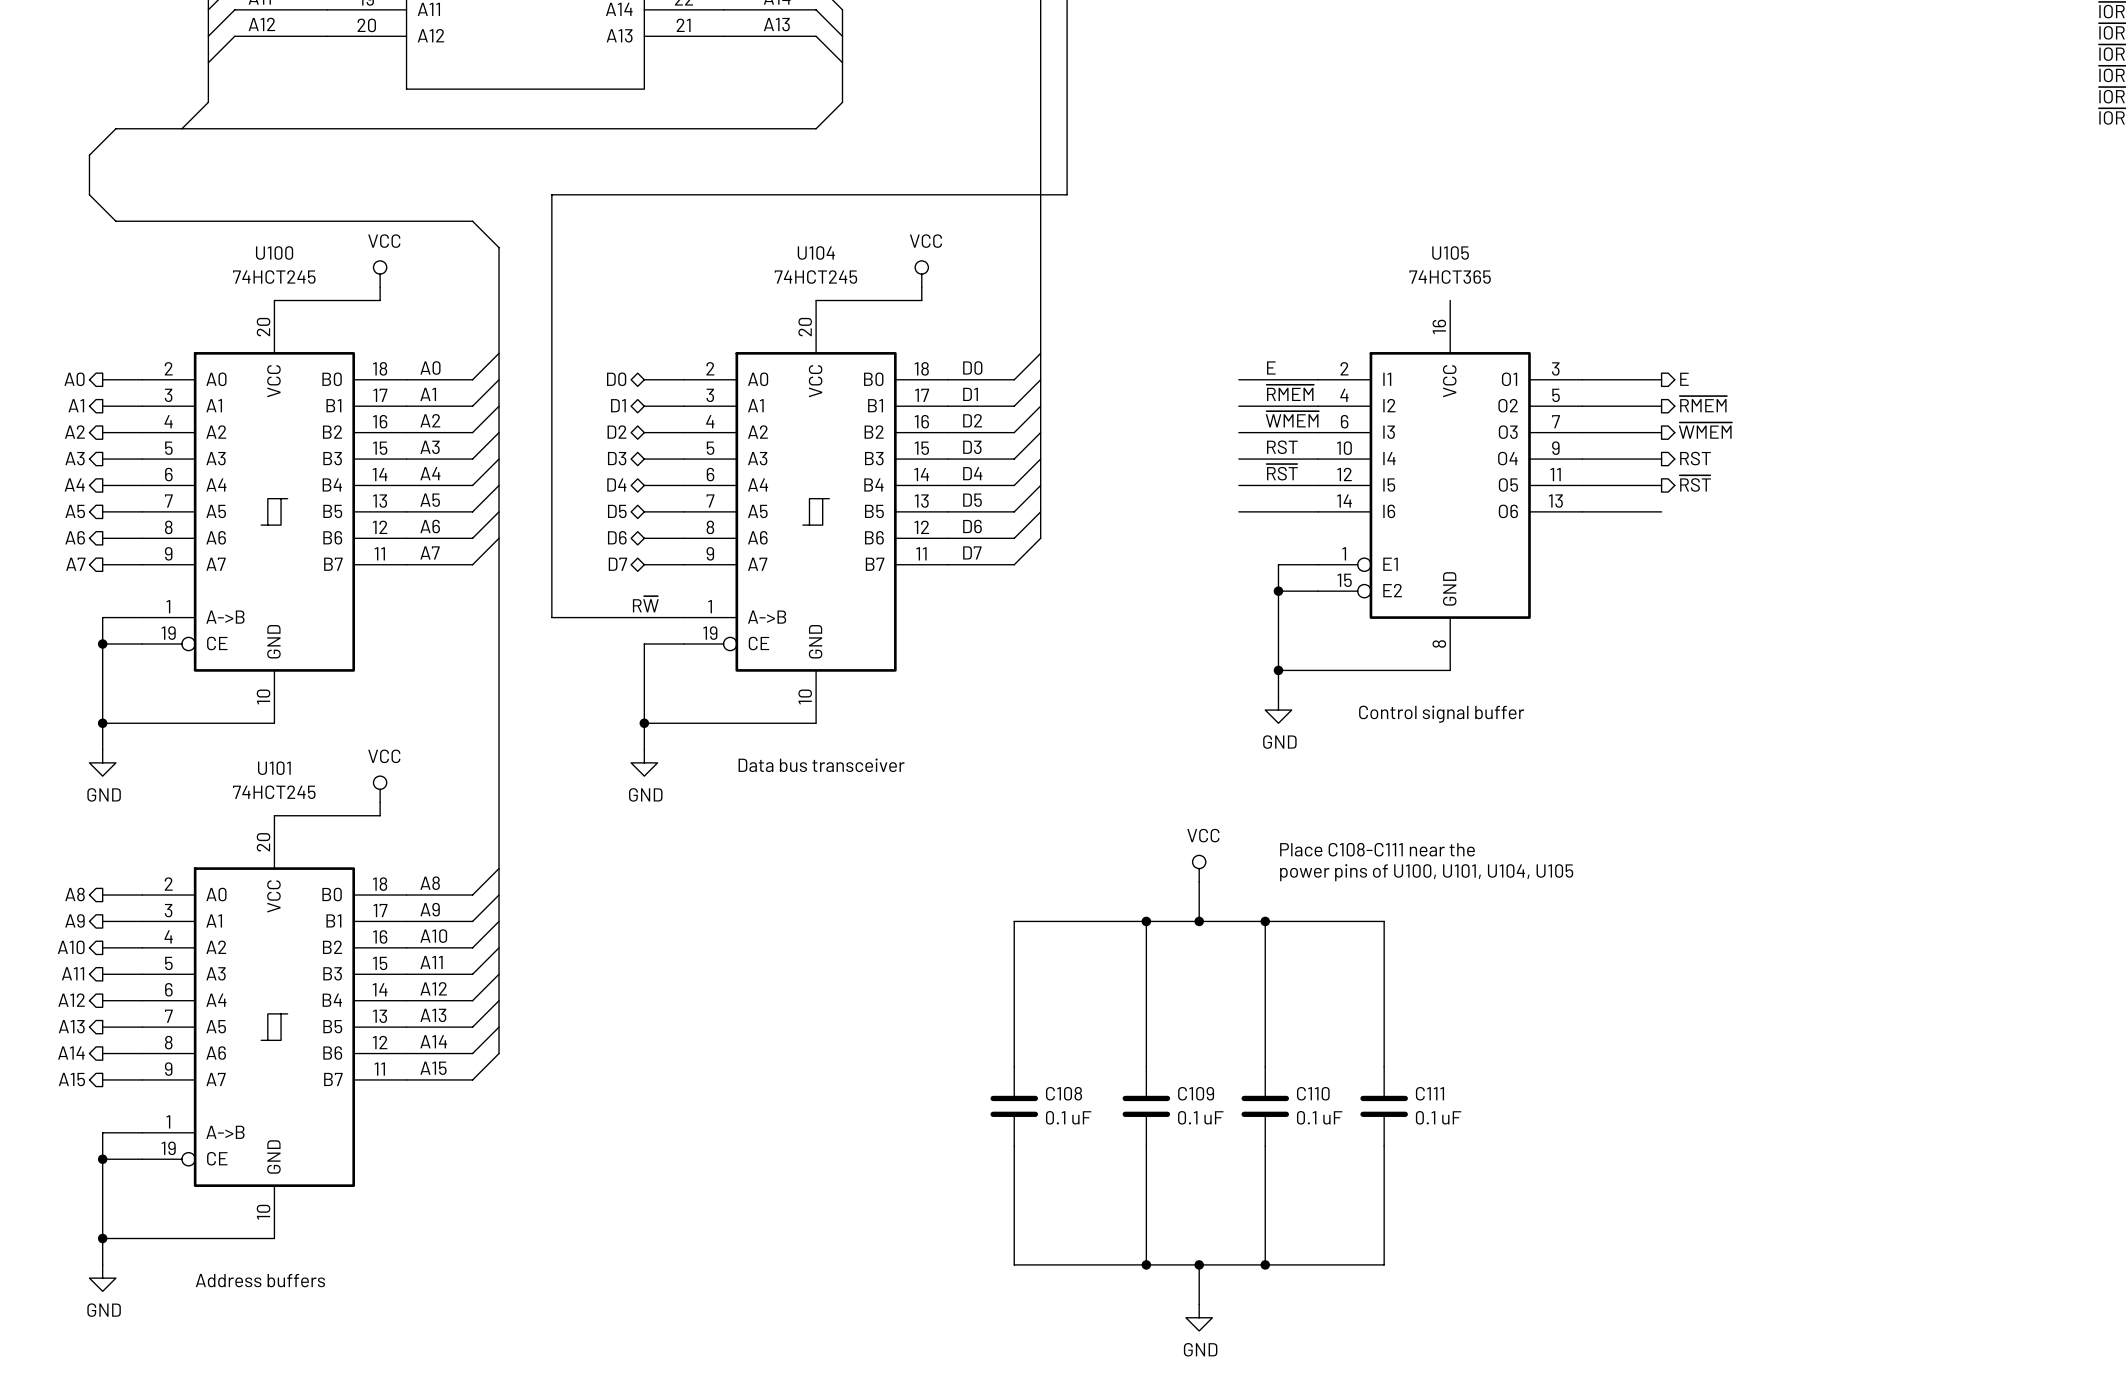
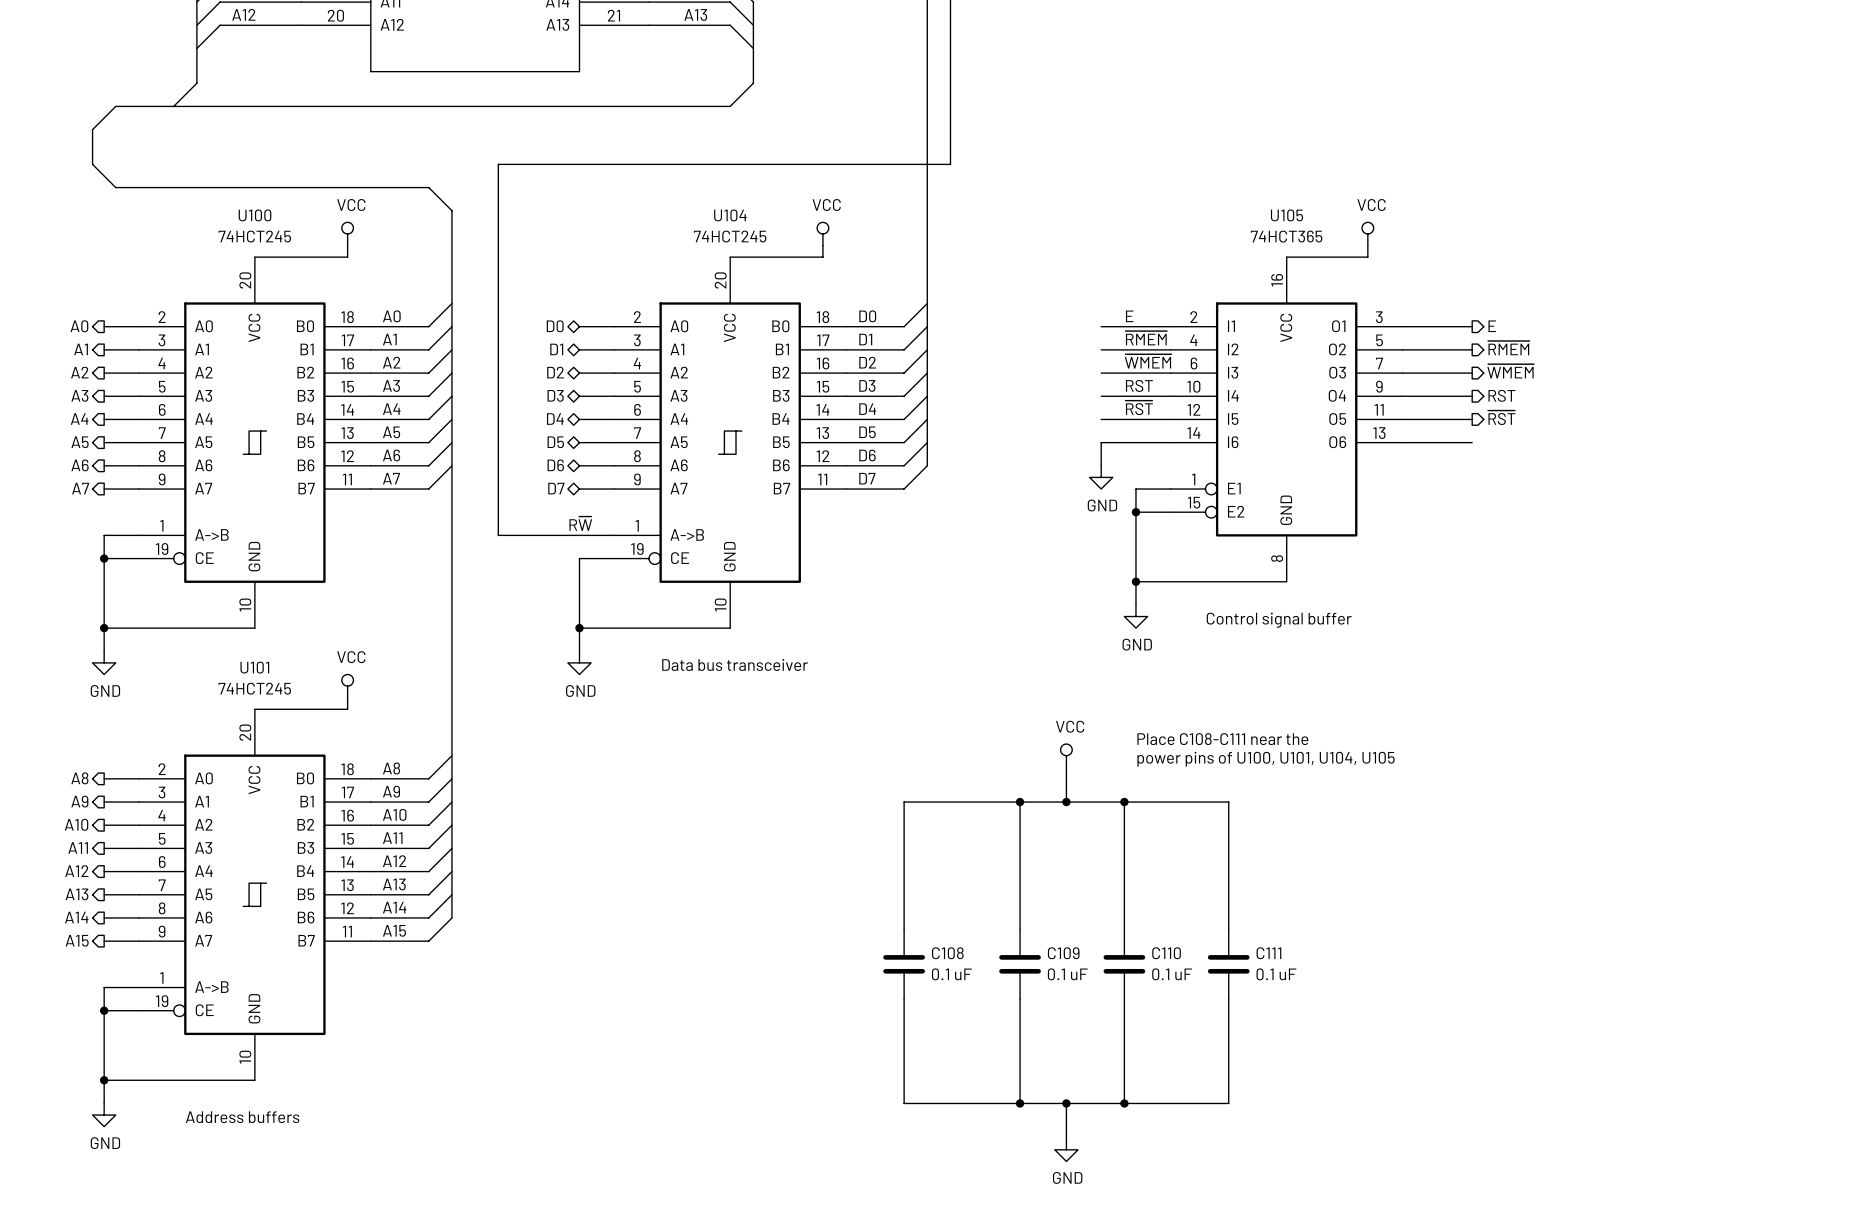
power symbol: none -> VCC (1367, 233)
wire: none -> (1367, 245) (1367, 257) (1286, 257)
wire: none -> (1101, 442) (1101, 465)
power symbol: none -> GND (1101, 477)

